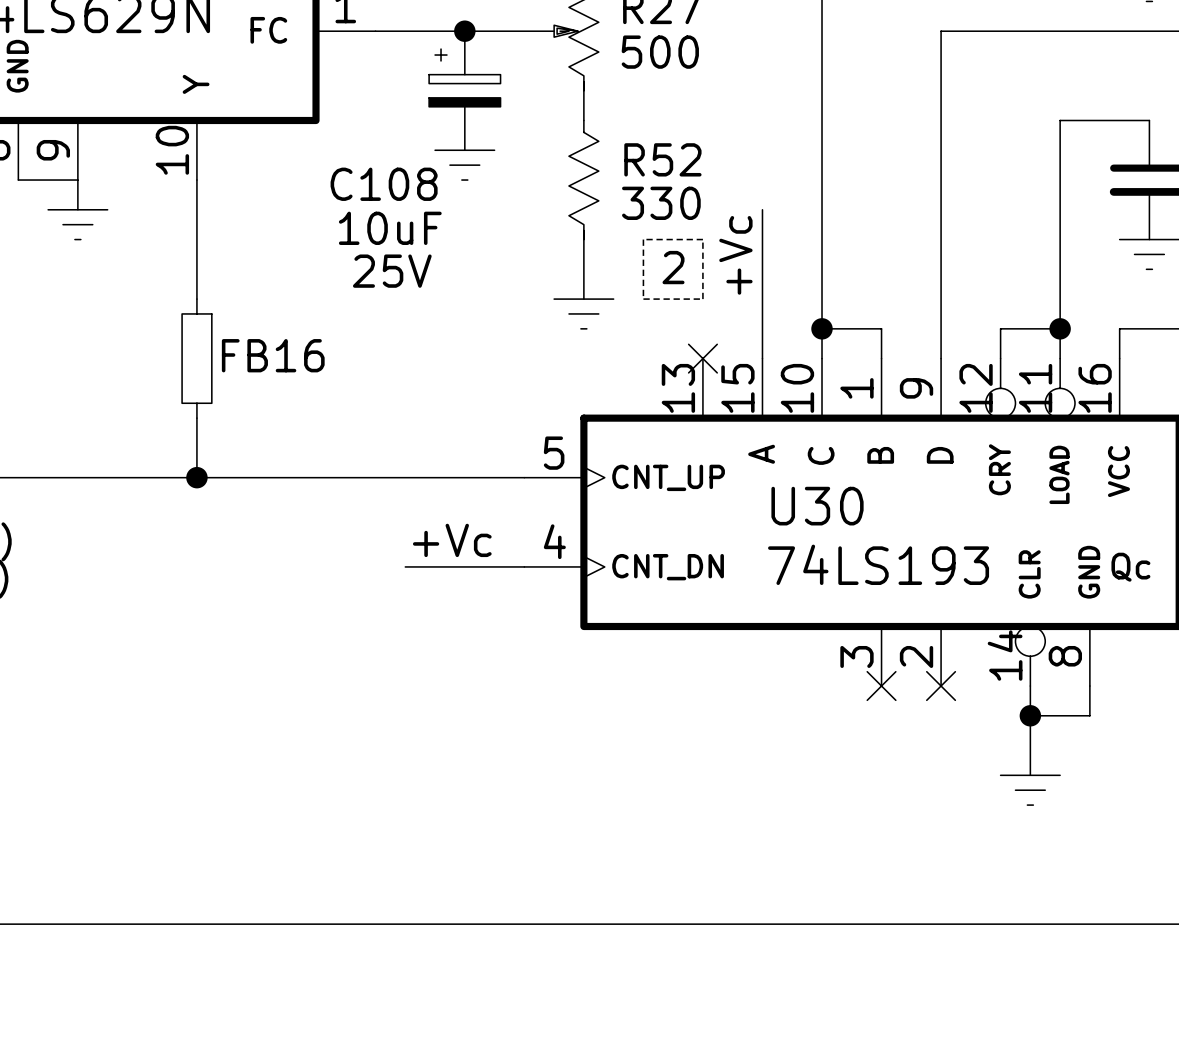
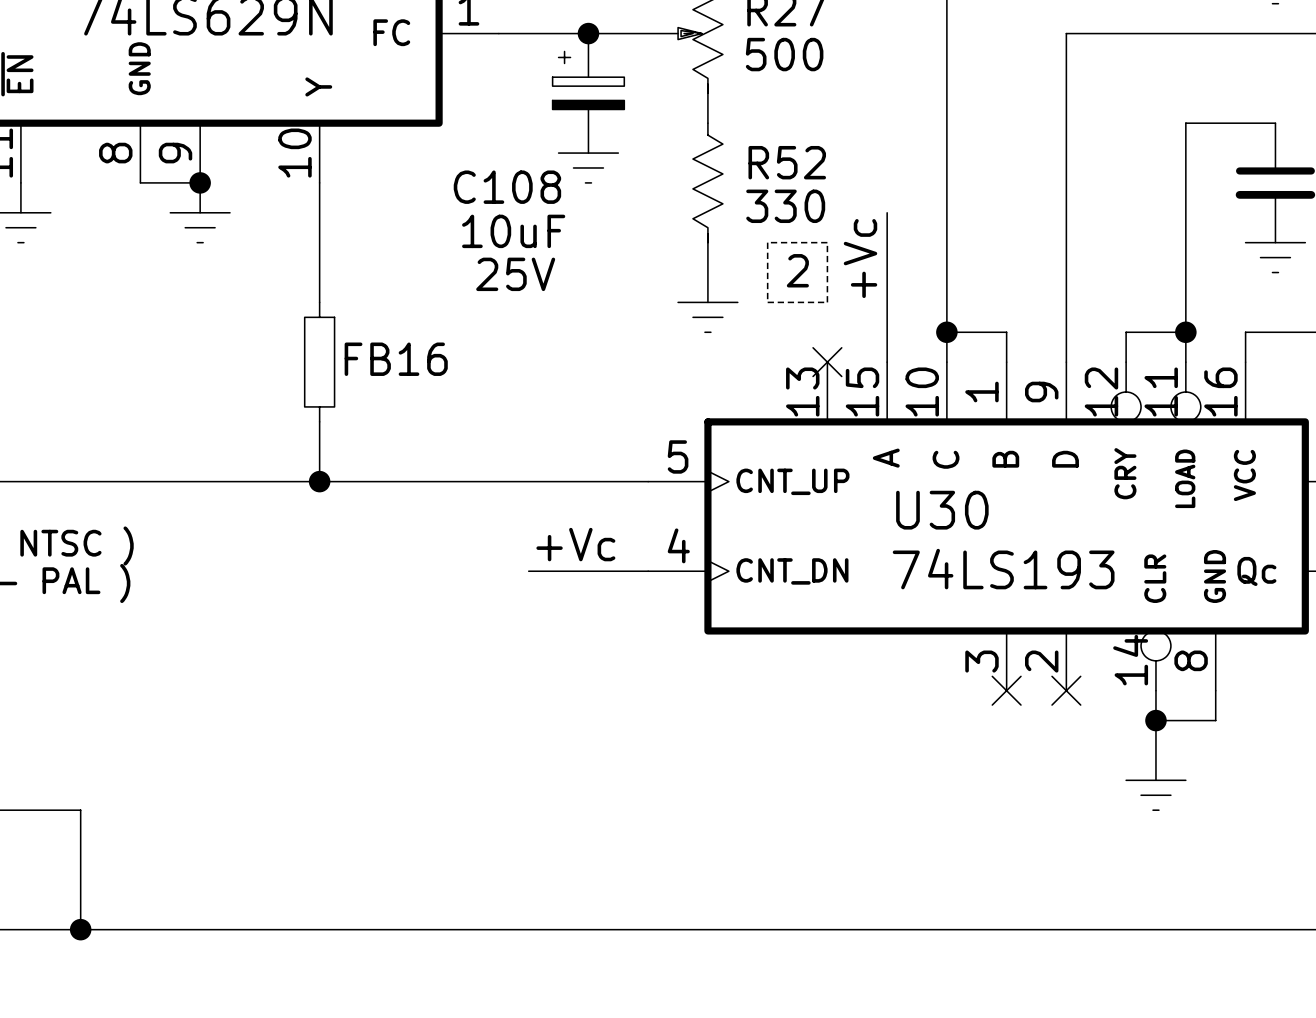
junction: none -> (200, 182)

